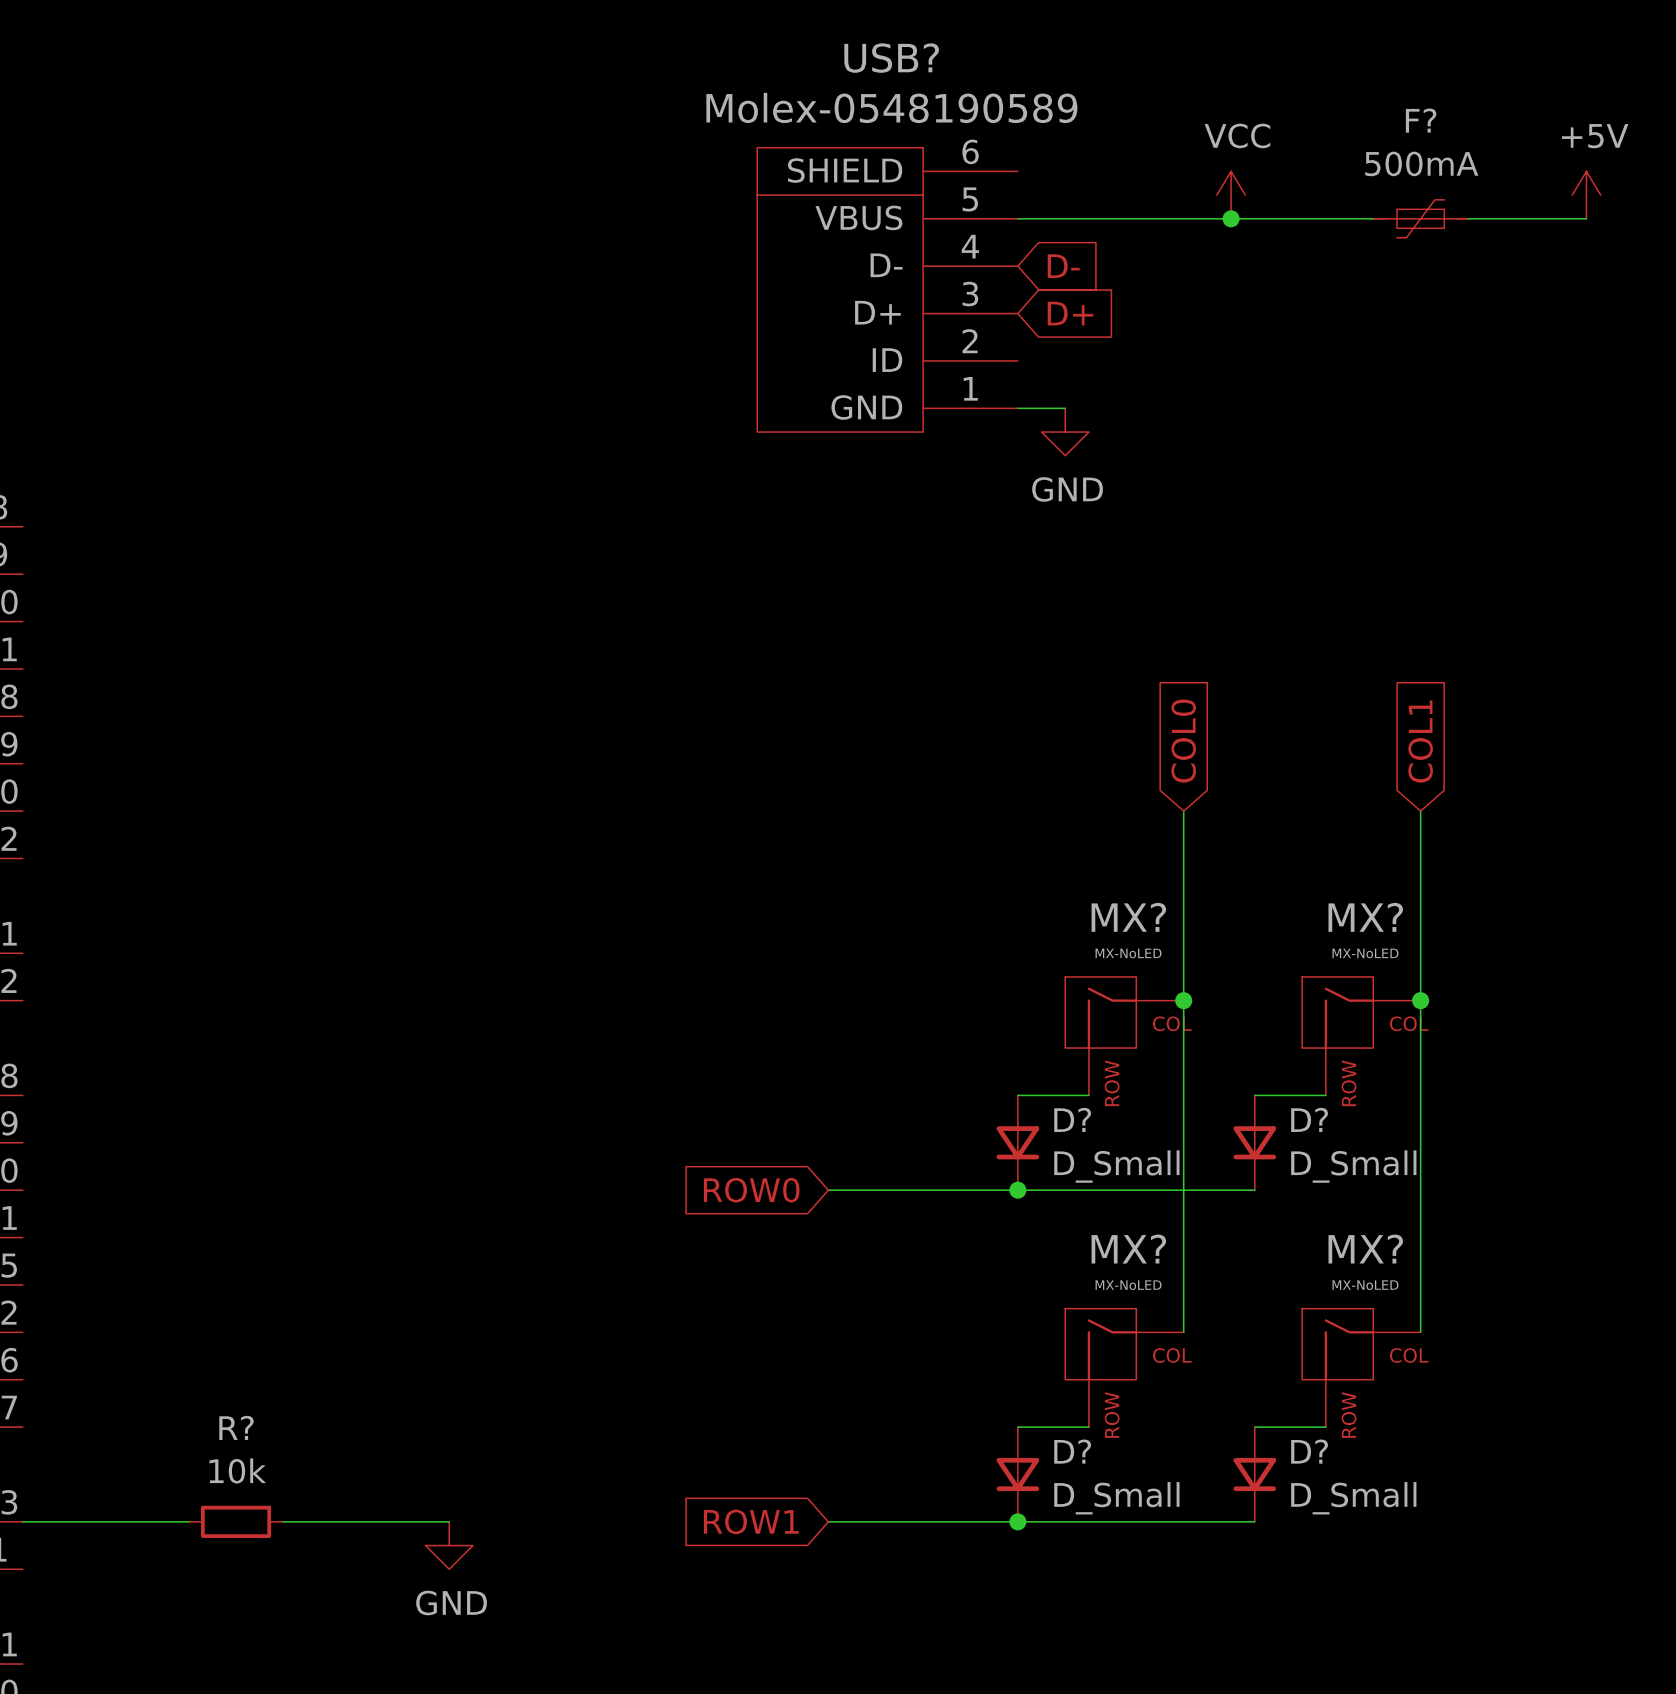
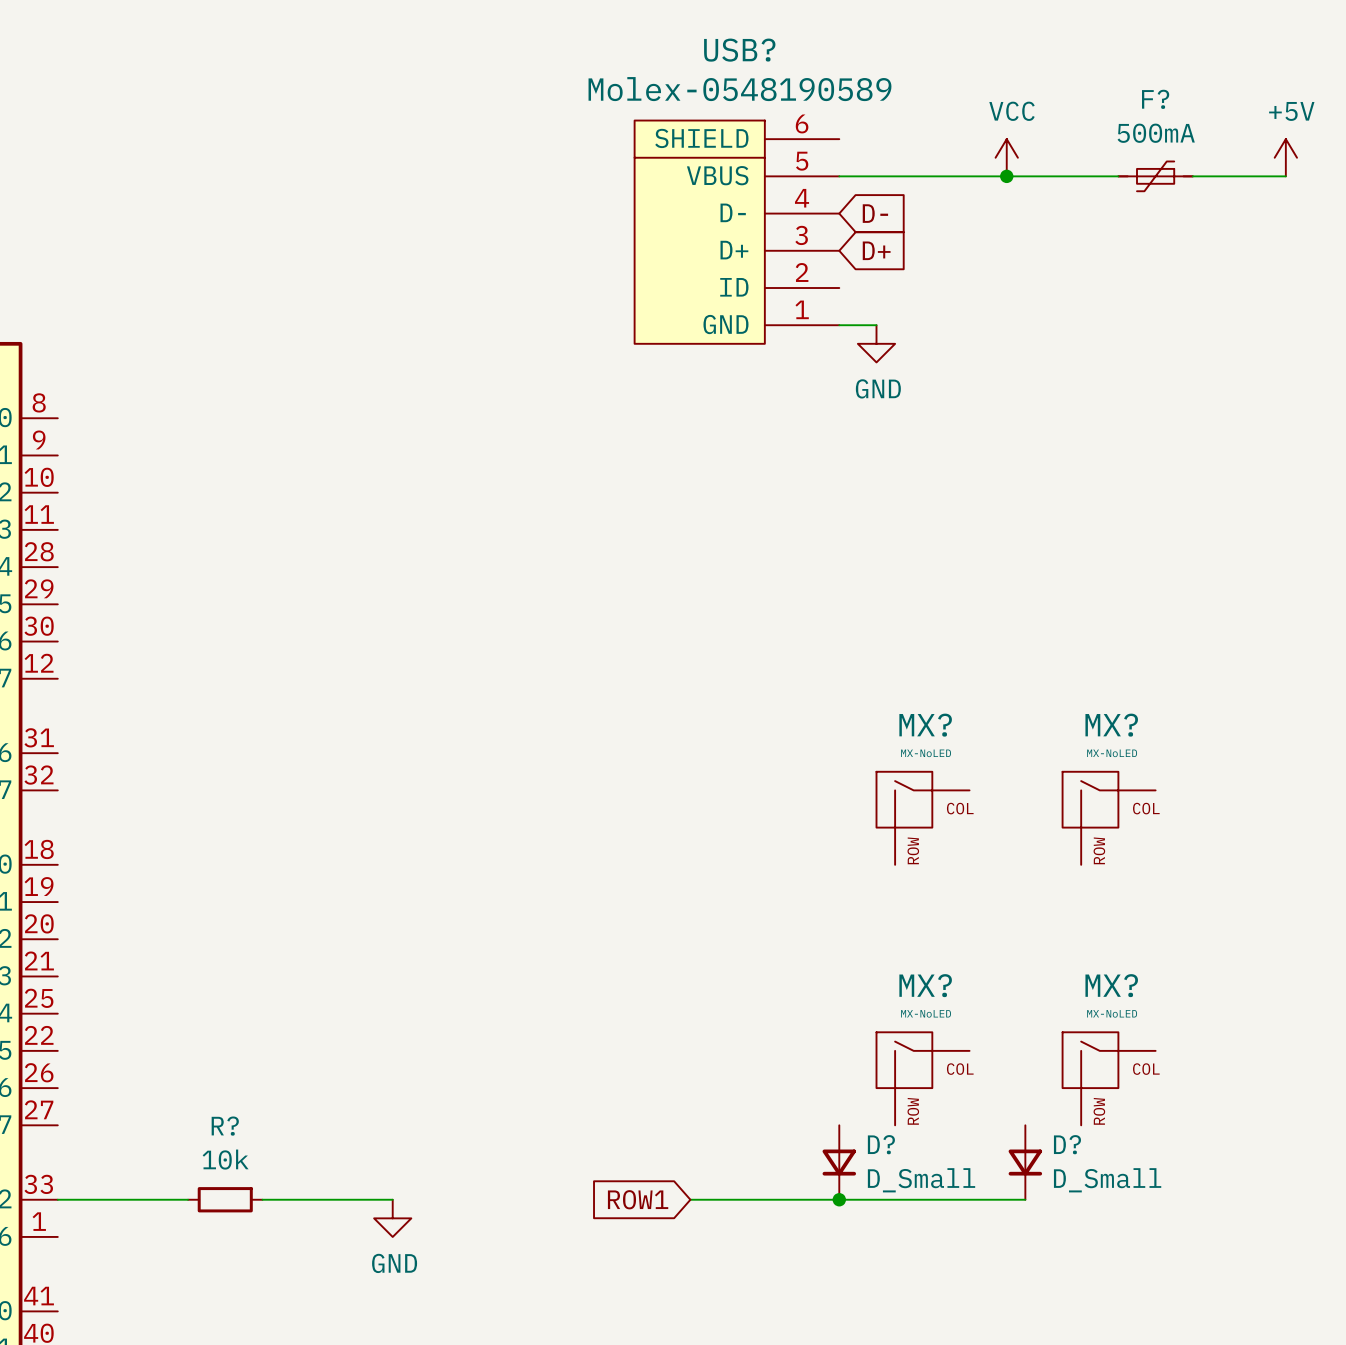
global label: COL0 (1183, 741) -> none
global label: COL1 (1420, 741) -> none
wire: (1183, 811) (1183, 1332) -> none
wire: (1420, 811) (1420, 1332) -> none
junction: (1183, 1000) -> none
junction: (1420, 1000) -> none
wire: (1017, 1095) (1088, 1095) -> none
wire: (1254, 1095) (1325, 1095) -> none
D?: D_Small (1017, 1142) -> none
D?: D_Small (1254, 1142) -> none
global label: ROW0 (751, 1190) -> none
wire: (828, 1190) (1254, 1190) -> none
junction: (1017, 1190) -> none
wire: (1017, 1427) (1088, 1427) -> none
wire: (1254, 1427) (1325, 1427) -> none

